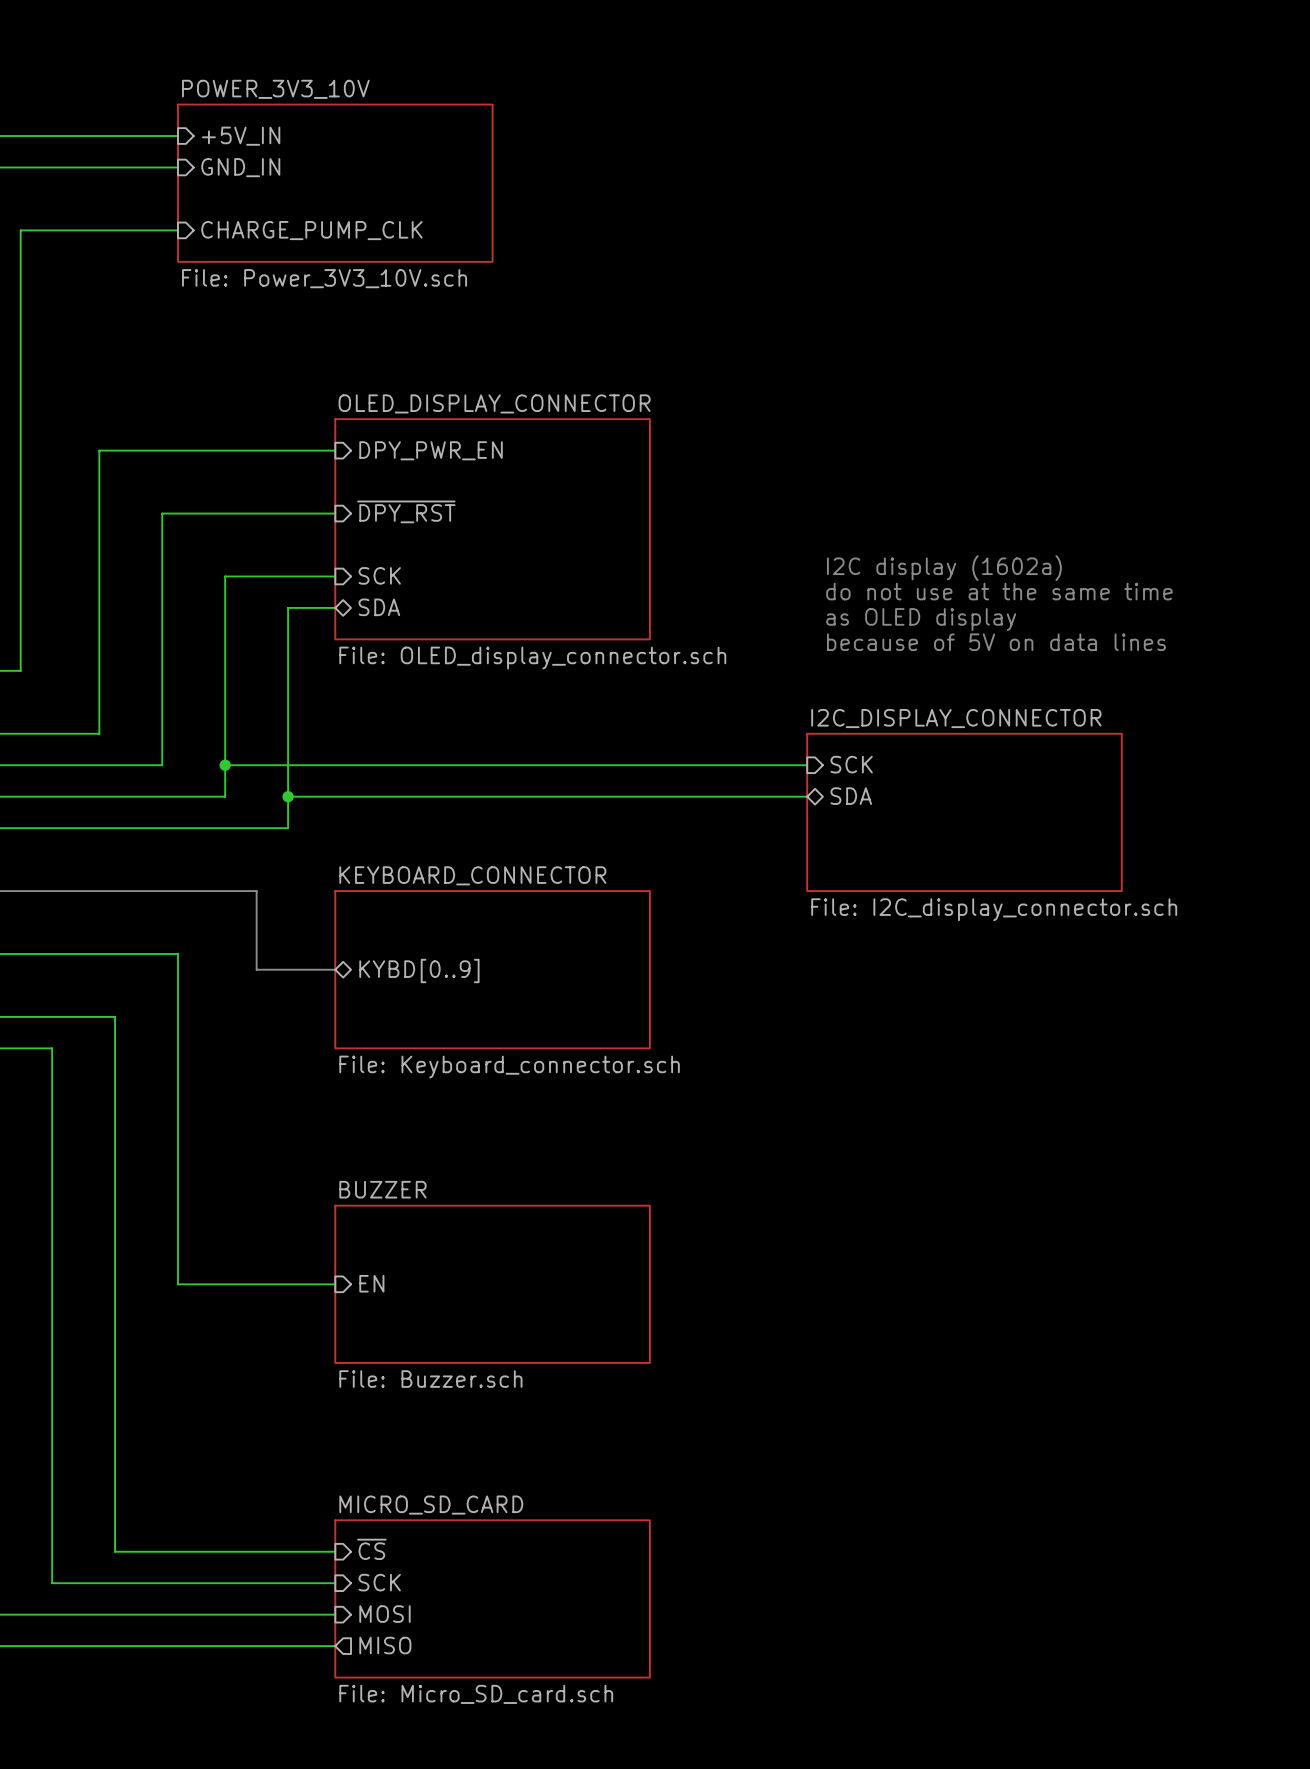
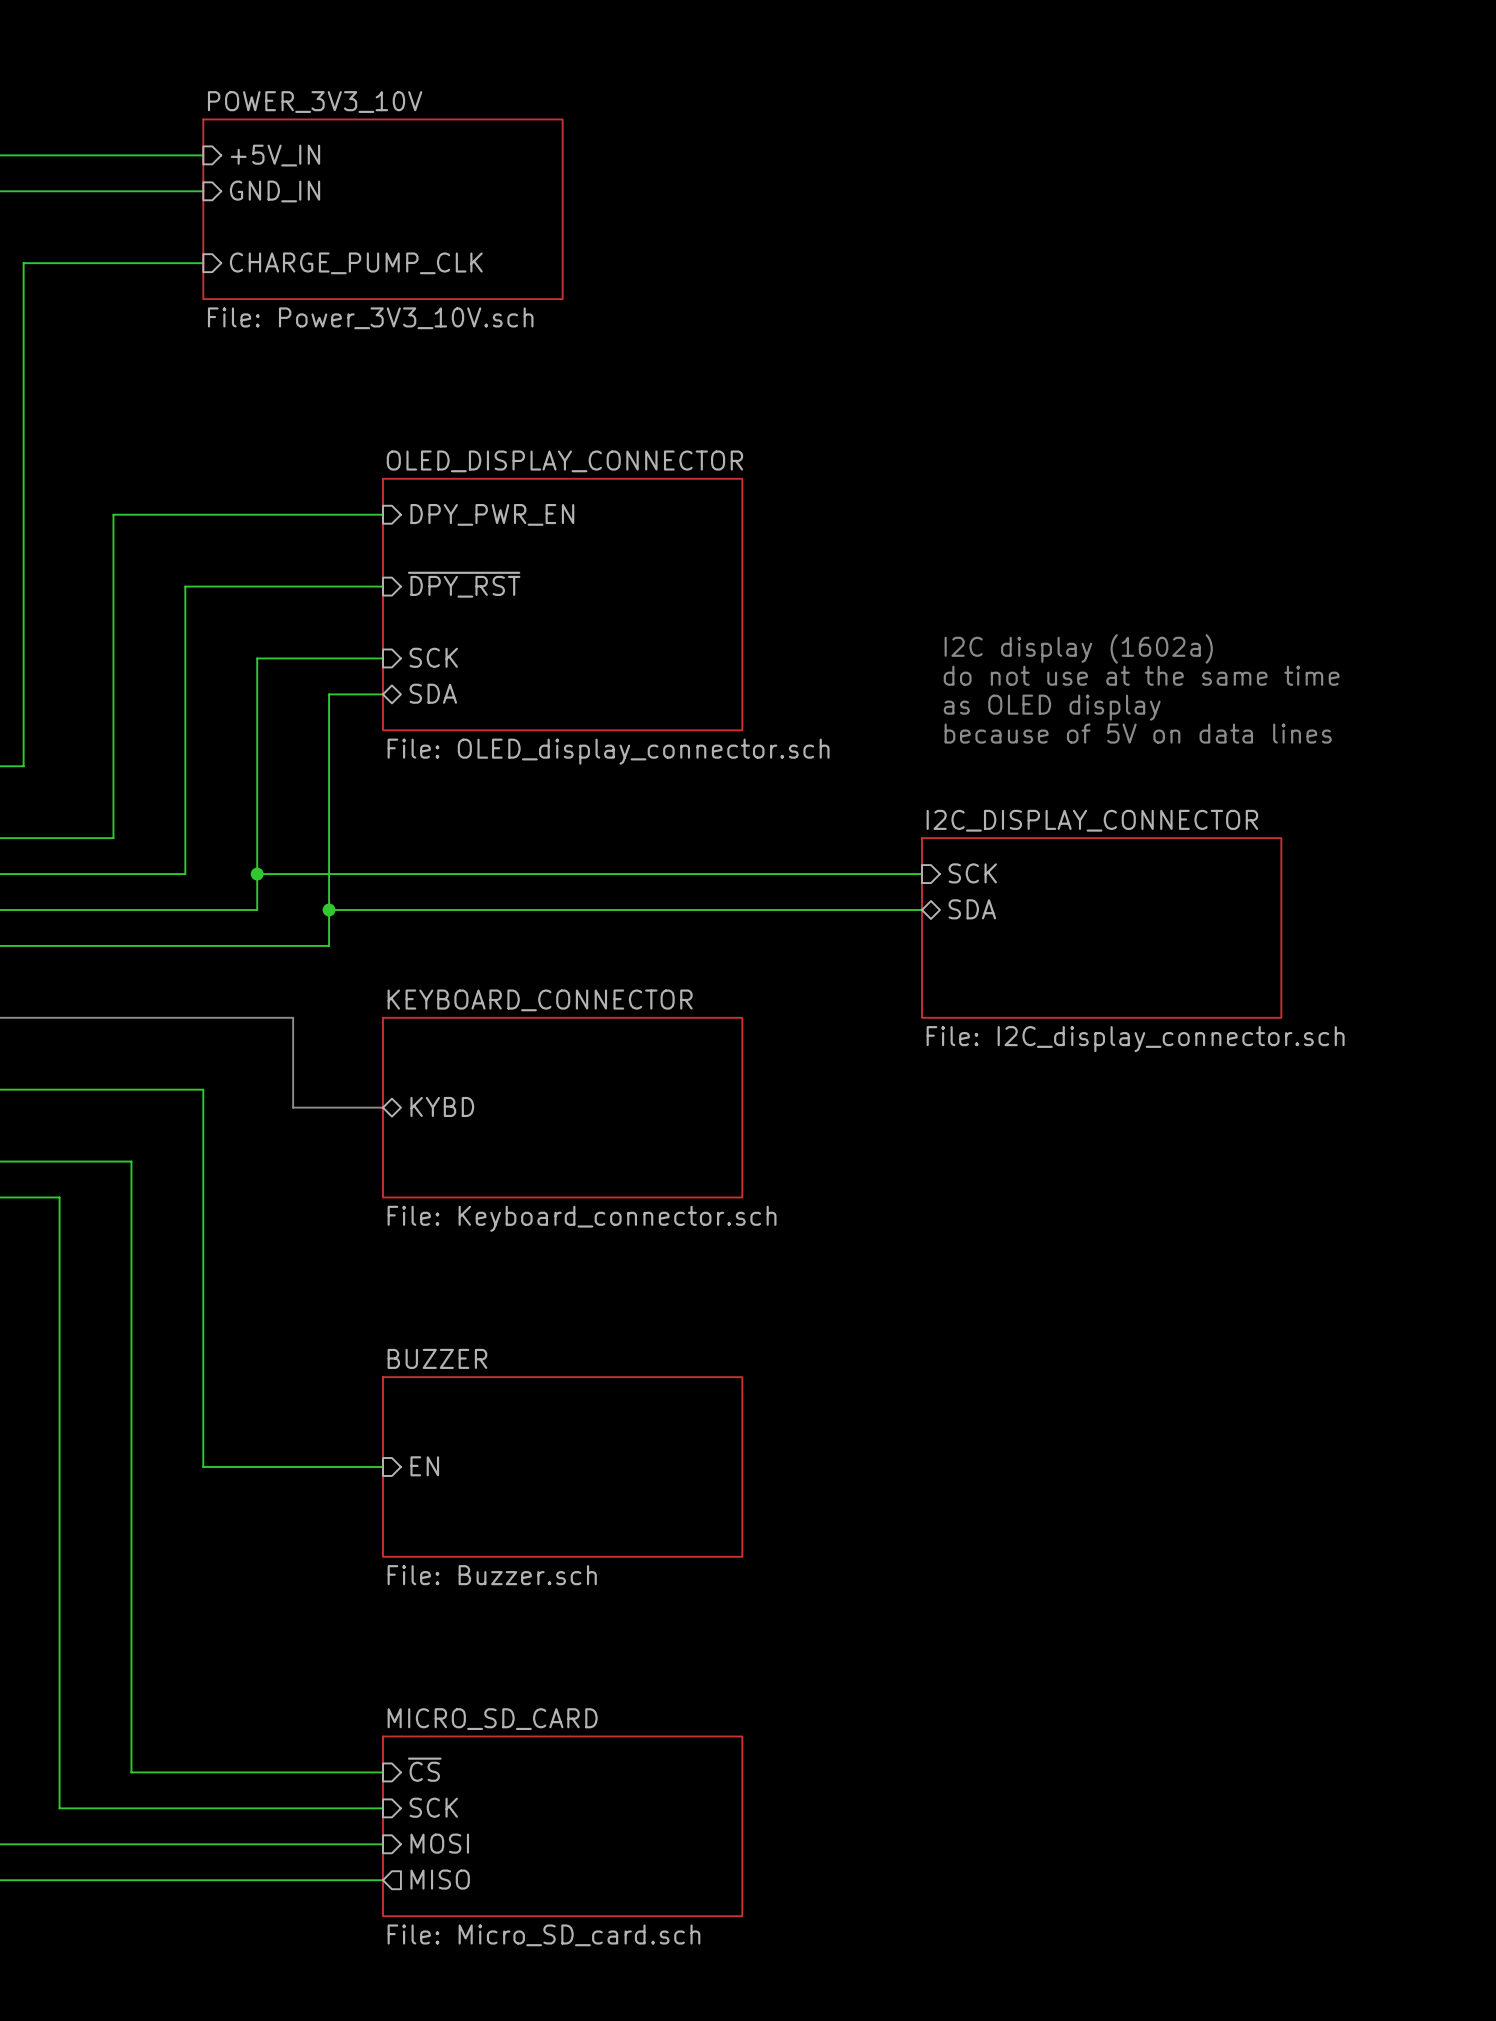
sheet pin: KYBD[0..9] (419, 971) -> KYBD (442, 1106)

